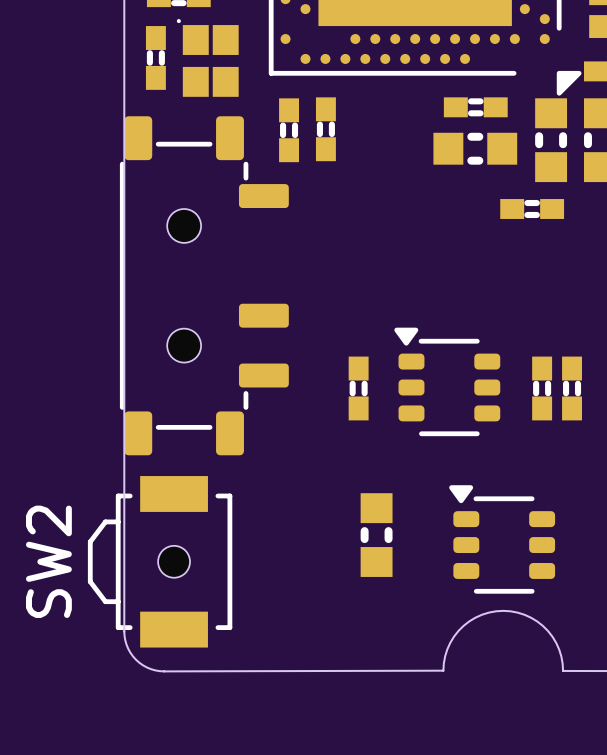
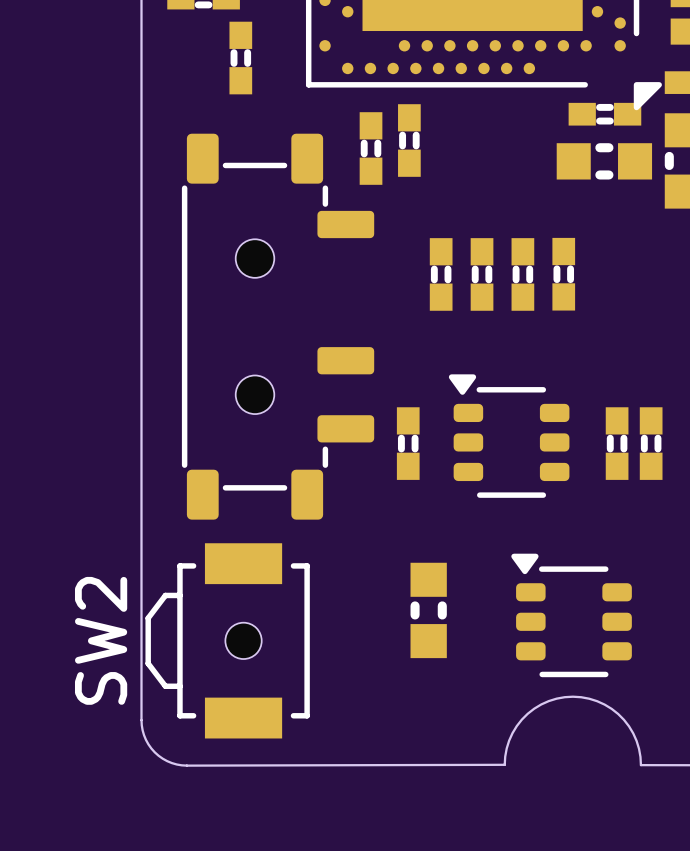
part footprint: [176, 19, 239, 97] -> [229, 21, 253, 95]
part: (155, 57) -> none
part: none -> (604, 114)
part: (475, 107) -> none
part: none -> (409, 140)
part: (289, 130) -> none
part rotation: 0° (551, 140) -> 90° clockwise (604, 161)
part: (475, 148) -> none
part: (532, 209) -> none
part: none -> (441, 274)
part: none -> (482, 274)
part: none -> (522, 274)
part: none -> (563, 274)
part position: (204, 285) -> (278, 326)
SW2 position: (160, 561) -> (227, 640)

